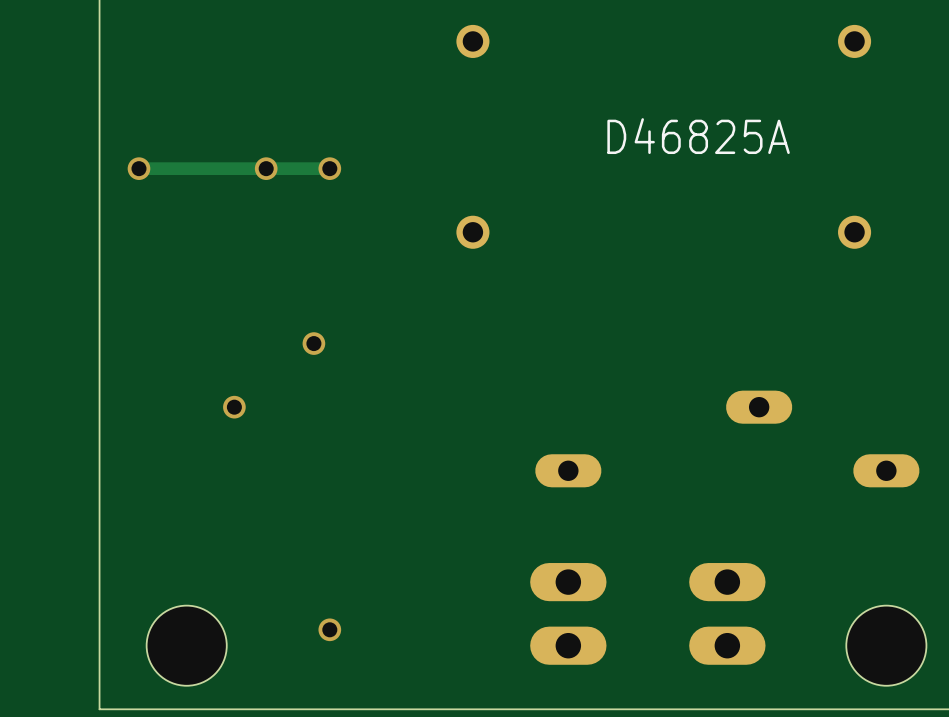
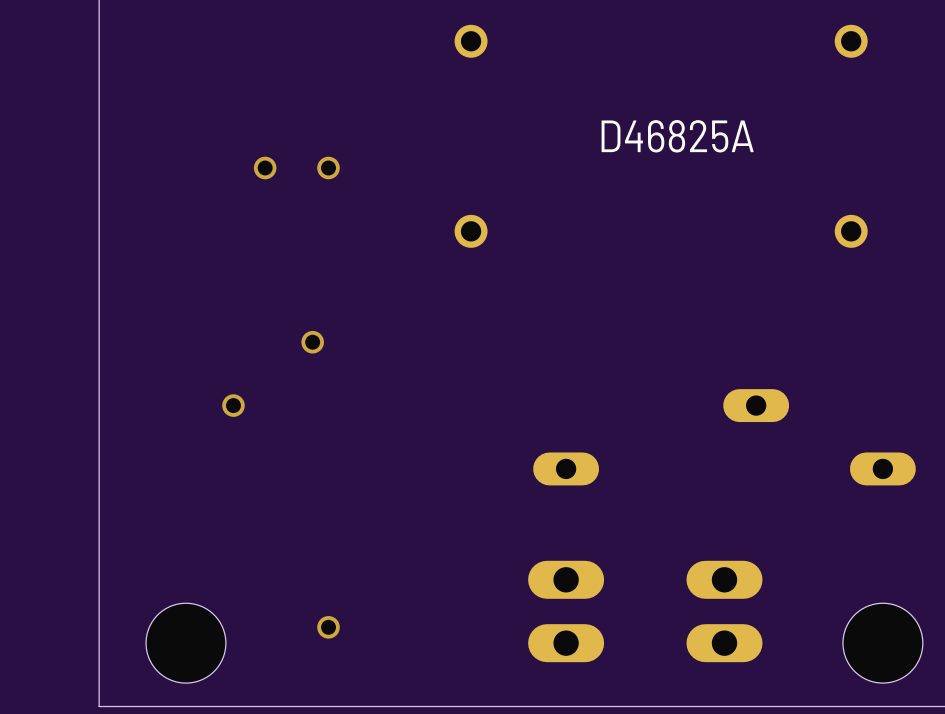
via: (138, 168) -> none
track: (329, 168) (138, 168) -> none

